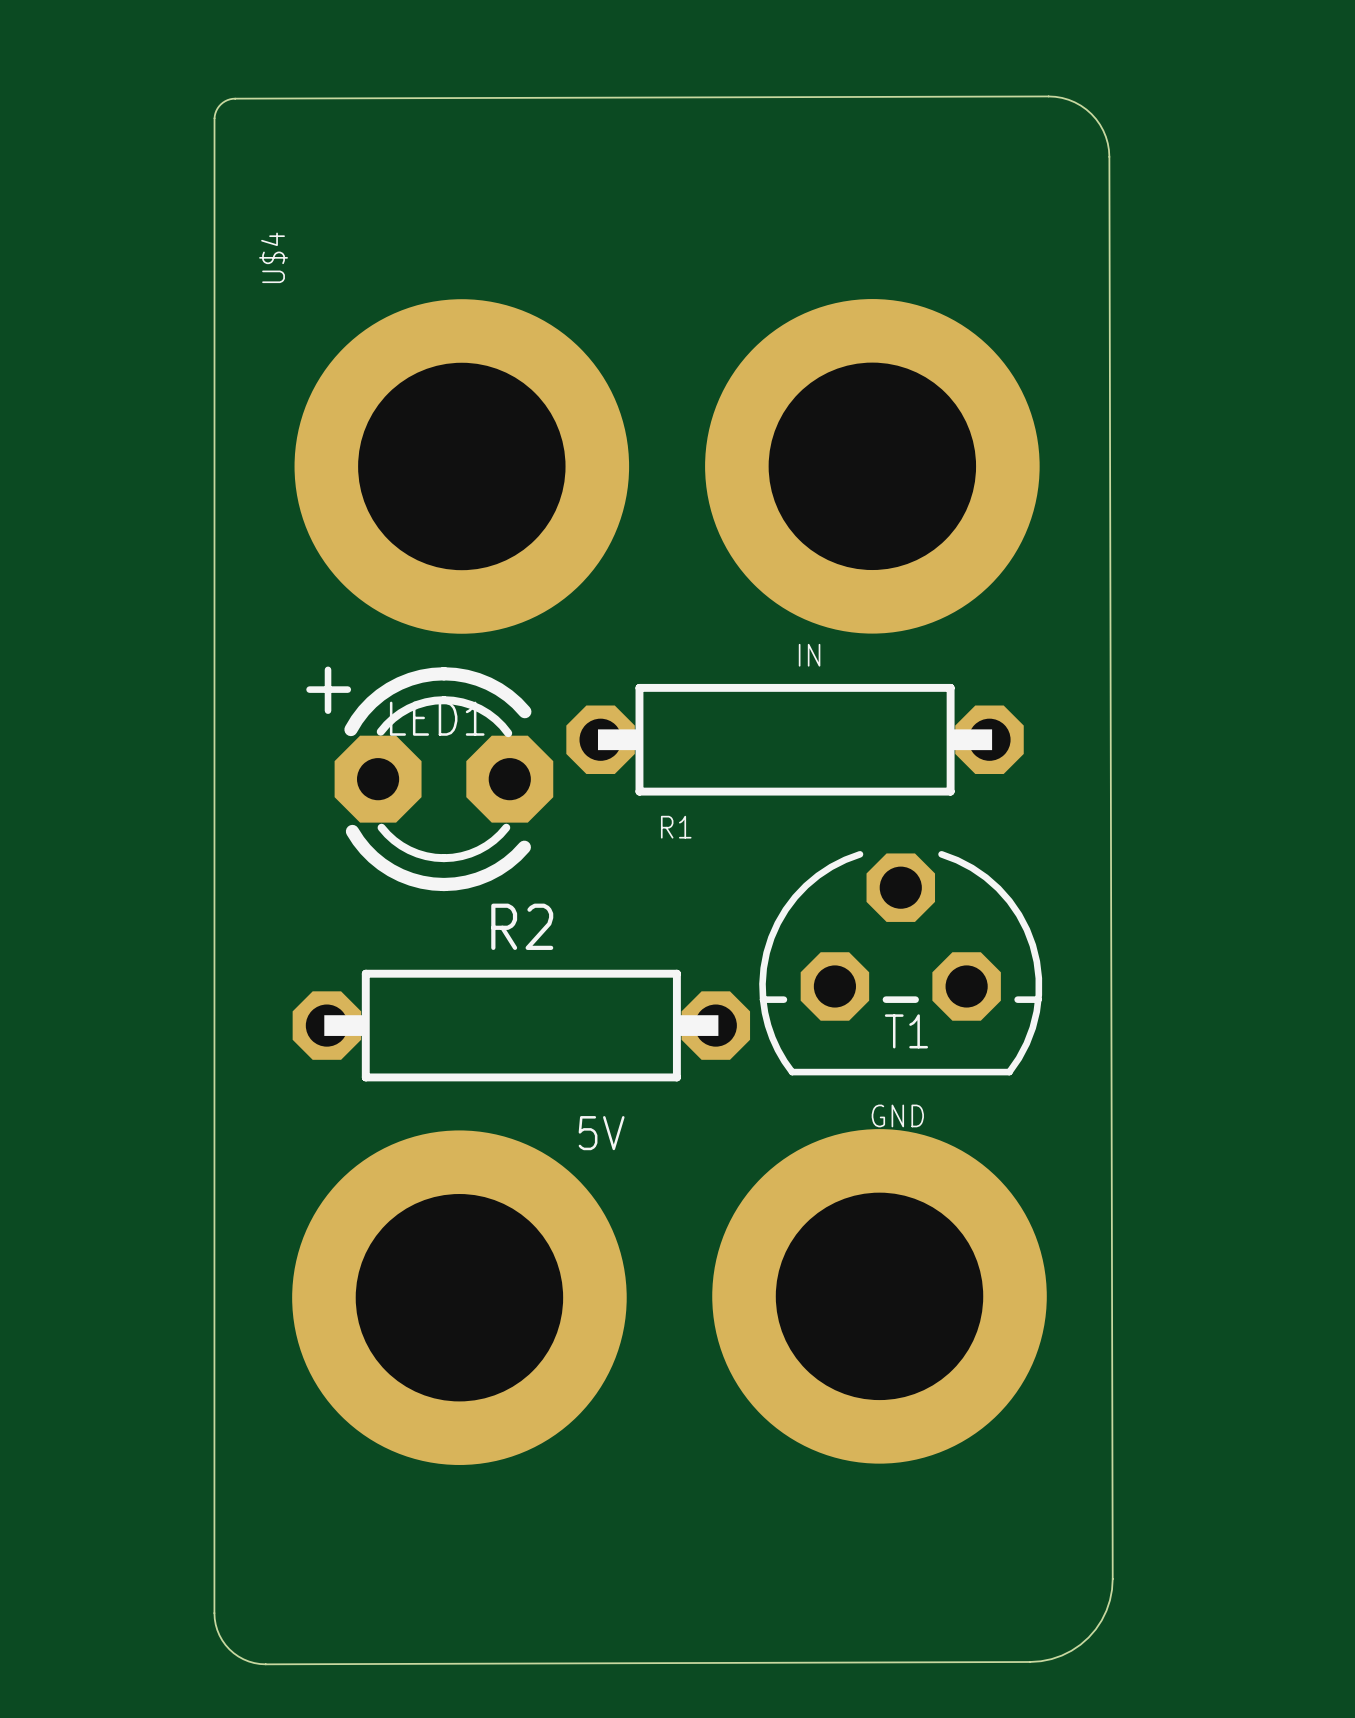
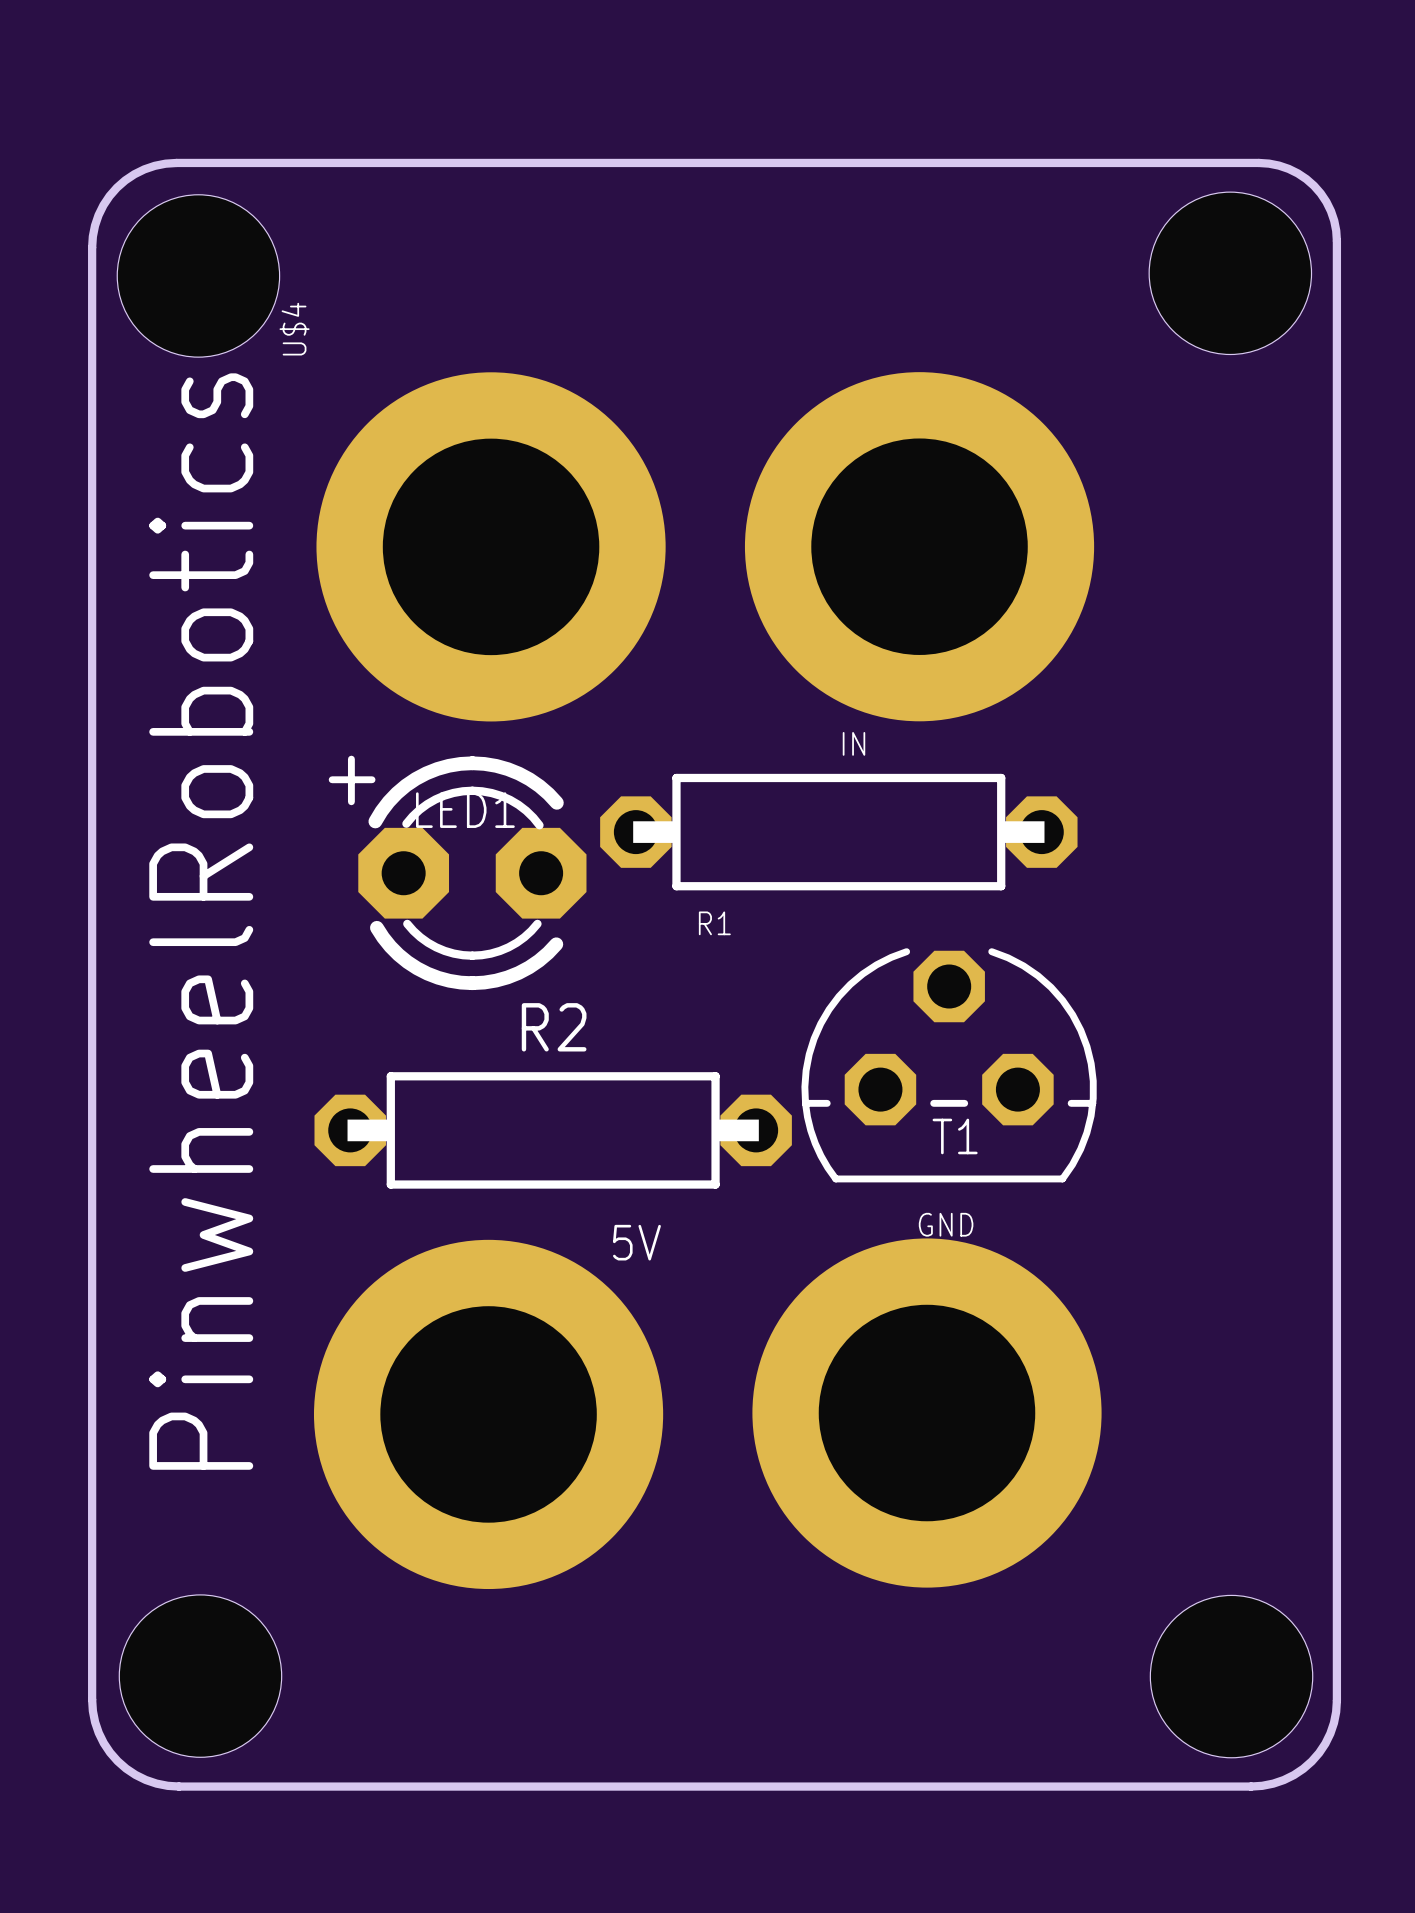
board edge: (1048, 96) (235, 98) (222, 102) (216, 110) (214, 118) (214, 1613) (215, 1624) (222, 1640) (233, 1653) (243, 1659) (265, 1664) (1030, 1661) (1051, 1659) (1071, 1650) (1088, 1637) (1101, 1620) (1109, 1600) (1112, 1578) (1109, 156) (1105, 136) (1100, 124) (1091, 114) (1080, 105) (1068, 99) (1048, 96) -> (176, 162) (144, 169) (116, 187) (98, 215) (92, 247) (92, 1699) (95, 1722) (110, 1752) (135, 1774) (156, 1783) (179, 1786) (1251, 1786) (1283, 1780) (1303, 1768) (1325, 1743) (1333, 1722) (1336, 1700) (1336, 241) (1334, 220) (1320, 193) (1297, 173) (1279, 165) (1258, 162) (176, 162)
hole: none -> (1230, 273)
hole: none -> (198, 275)
text: none -> PinwheelRobotics (201, 921)
hole: none -> (200, 1676)
hole: none -> (1231, 1676)

